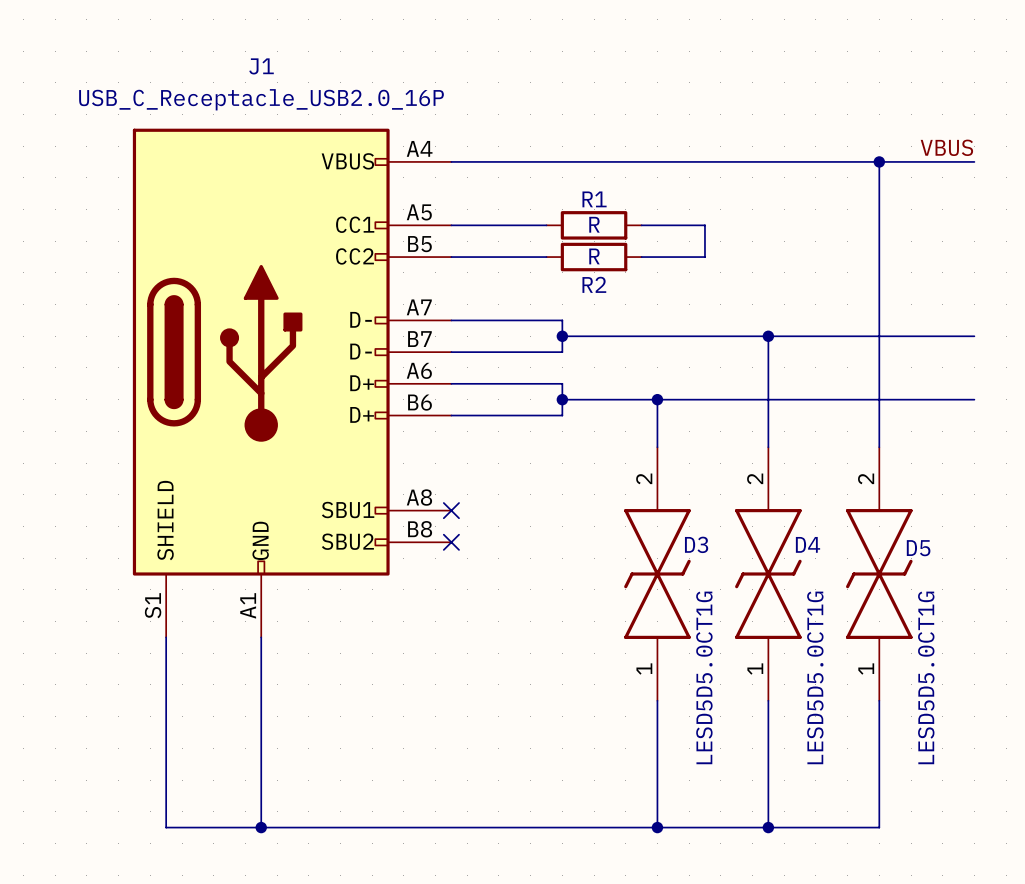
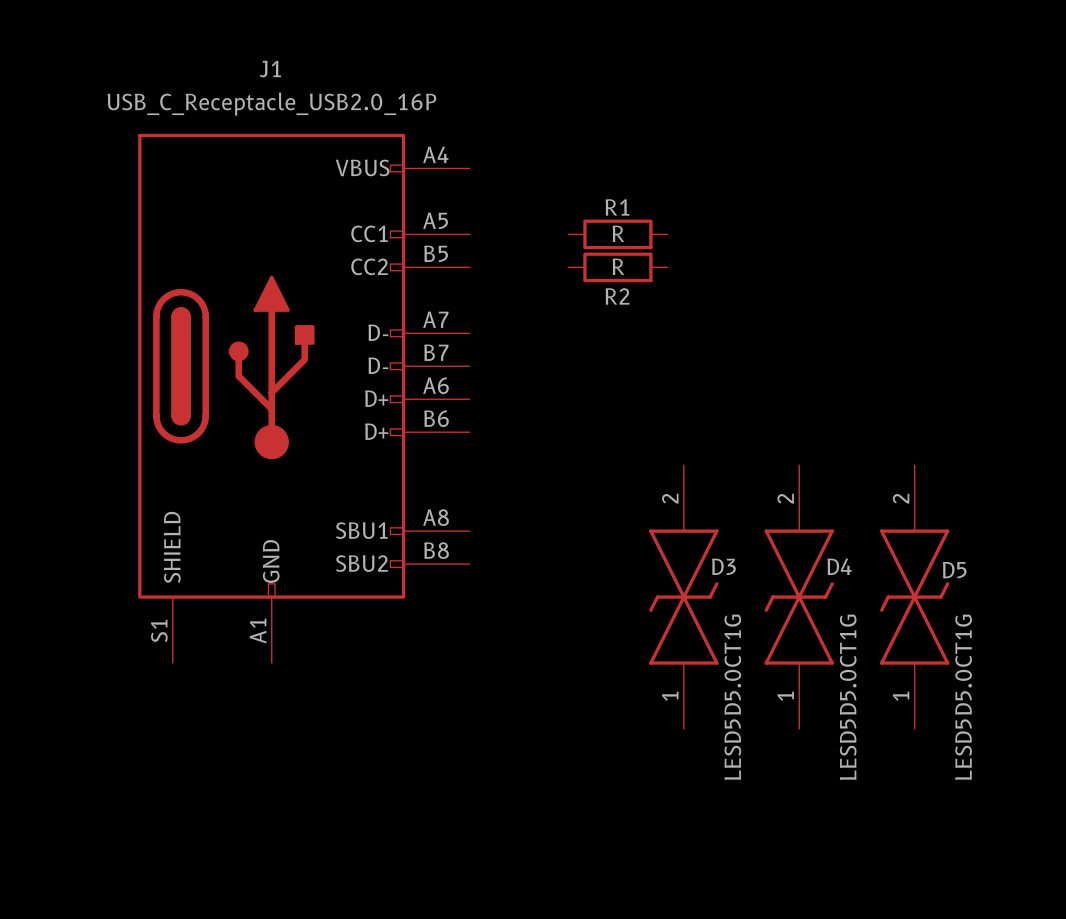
label: VBUS (946, 147) -> none
wire: (451, 161) (974, 161) -> none
wire: (879, 161) (879, 447) -> none
junction: (879, 161) -> none
wire: (451, 225) (546, 225) -> none
wire: (641, 225) (704, 225) (704, 257) (641, 257) -> none
wire: (451, 257) (546, 257) -> none
wire: (451, 320) (562, 320) (562, 352) (451, 352) -> none
wire: (562, 336) (974, 336) -> none
junction: (562, 336) -> none
wire: (768, 336) (768, 447) -> none
junction: (768, 336) -> none
wire: (451, 383) (562, 383) (562, 415) (451, 415) -> none
wire: (562, 399) (974, 399) -> none
junction: (562, 399) -> none
wire: (657, 399) (657, 447) -> none
junction: (657, 399) -> none
no-connect mark: (451, 510) -> none
no-connect mark: (451, 542) -> none
wire: (166, 637) (166, 827) (879, 827) (879, 700) -> none
wire: (261, 637) (261, 827) -> none
wire: (657, 700) (657, 827) -> none
wire: (768, 700) (768, 827) -> none
junction: (261, 827) -> none
junction: (657, 827) -> none
junction: (768, 827) -> none

